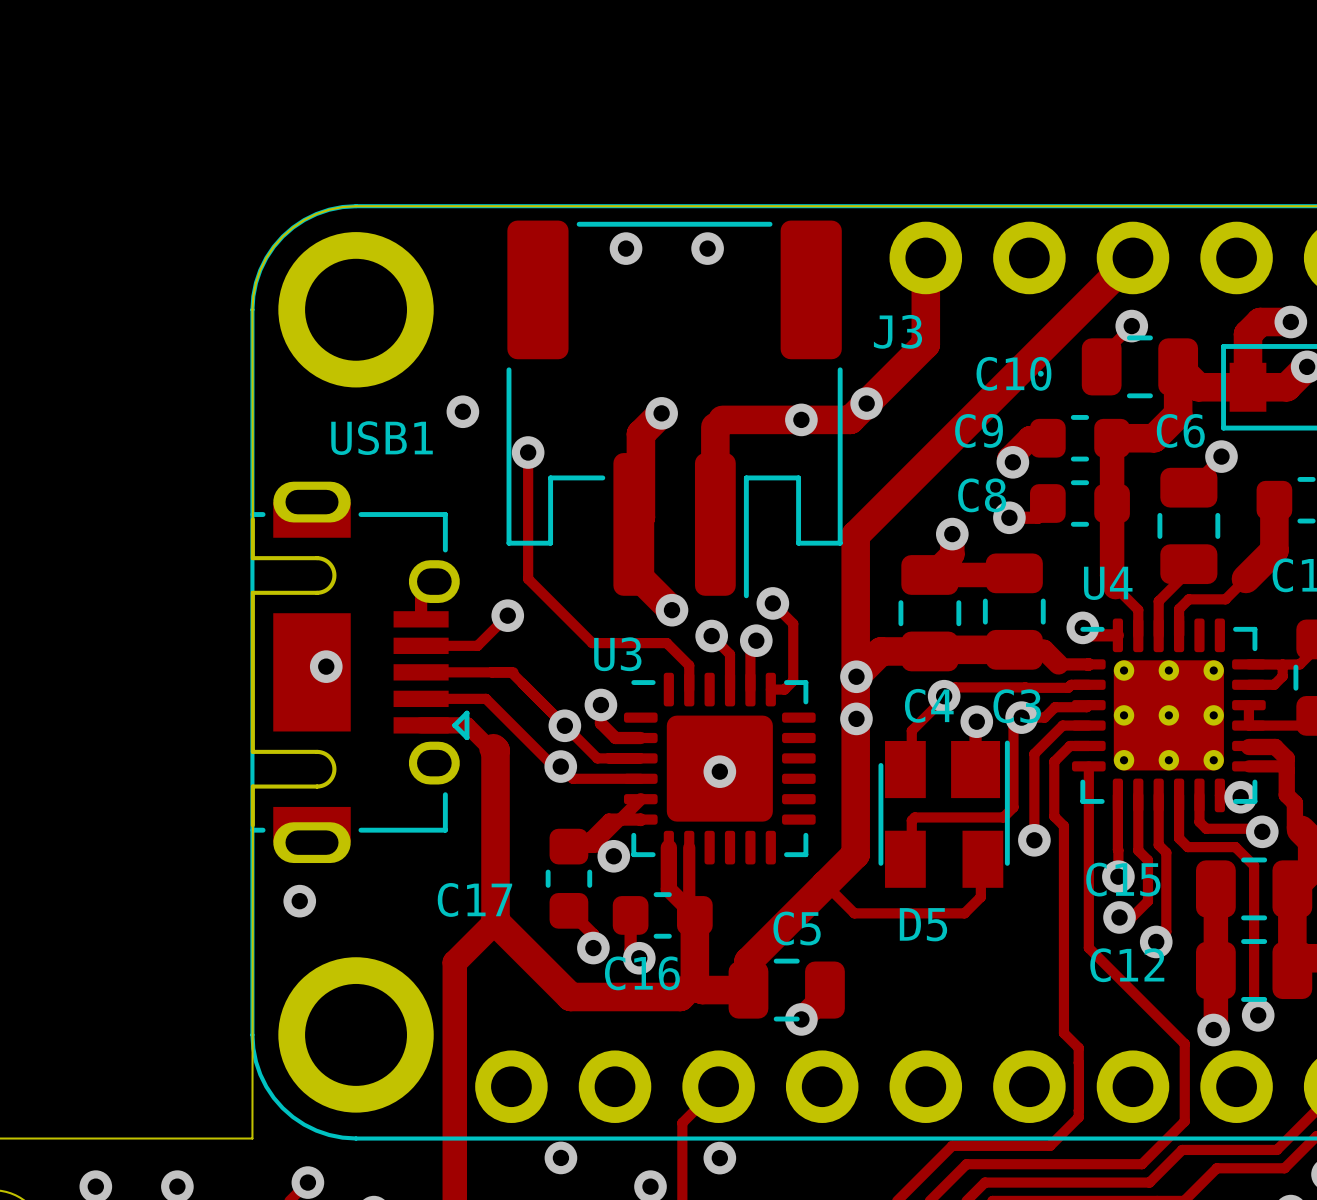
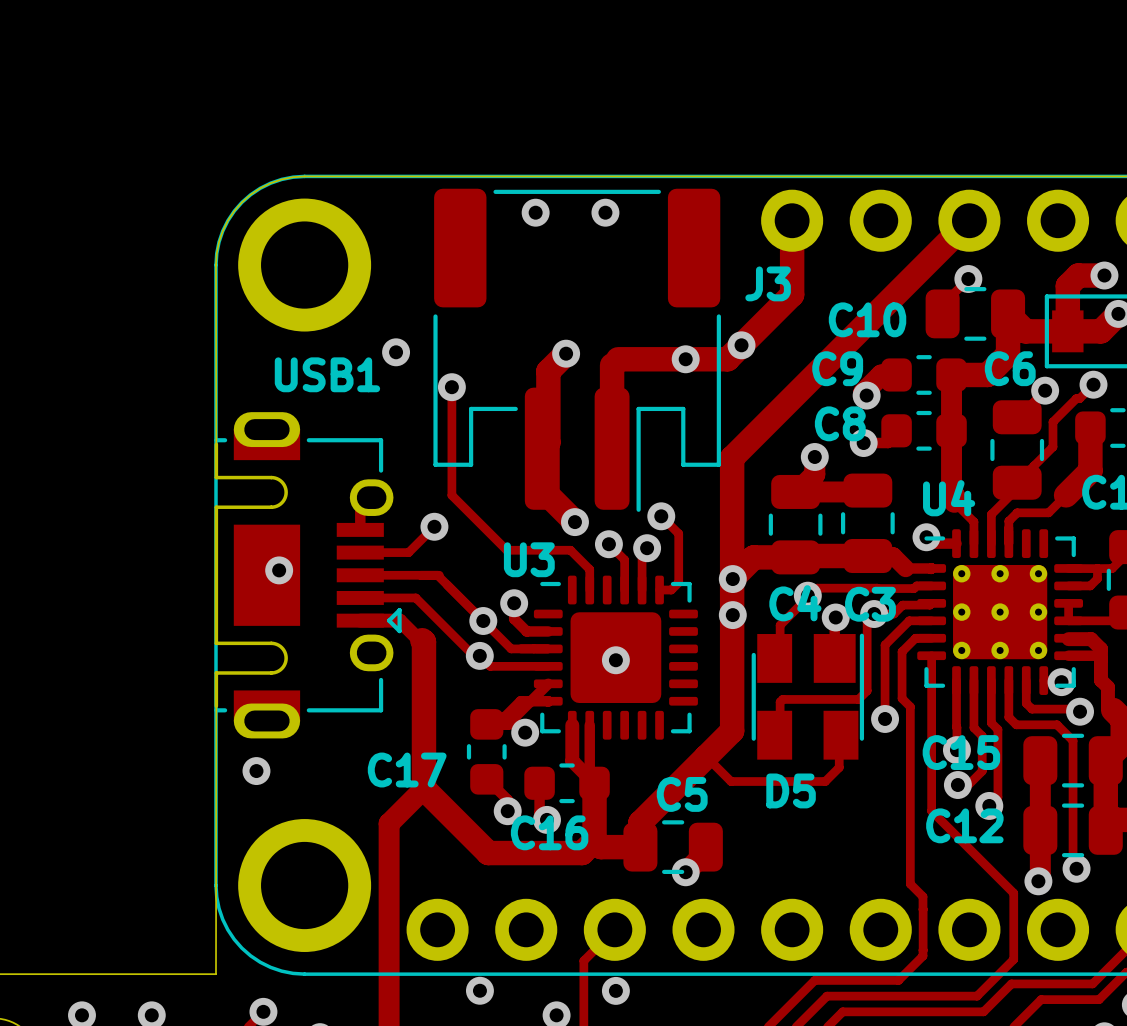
track: none -> (1093, 384) (1052, 422) (1052, 446) (1017, 482)
via: none -> (1093, 384)

